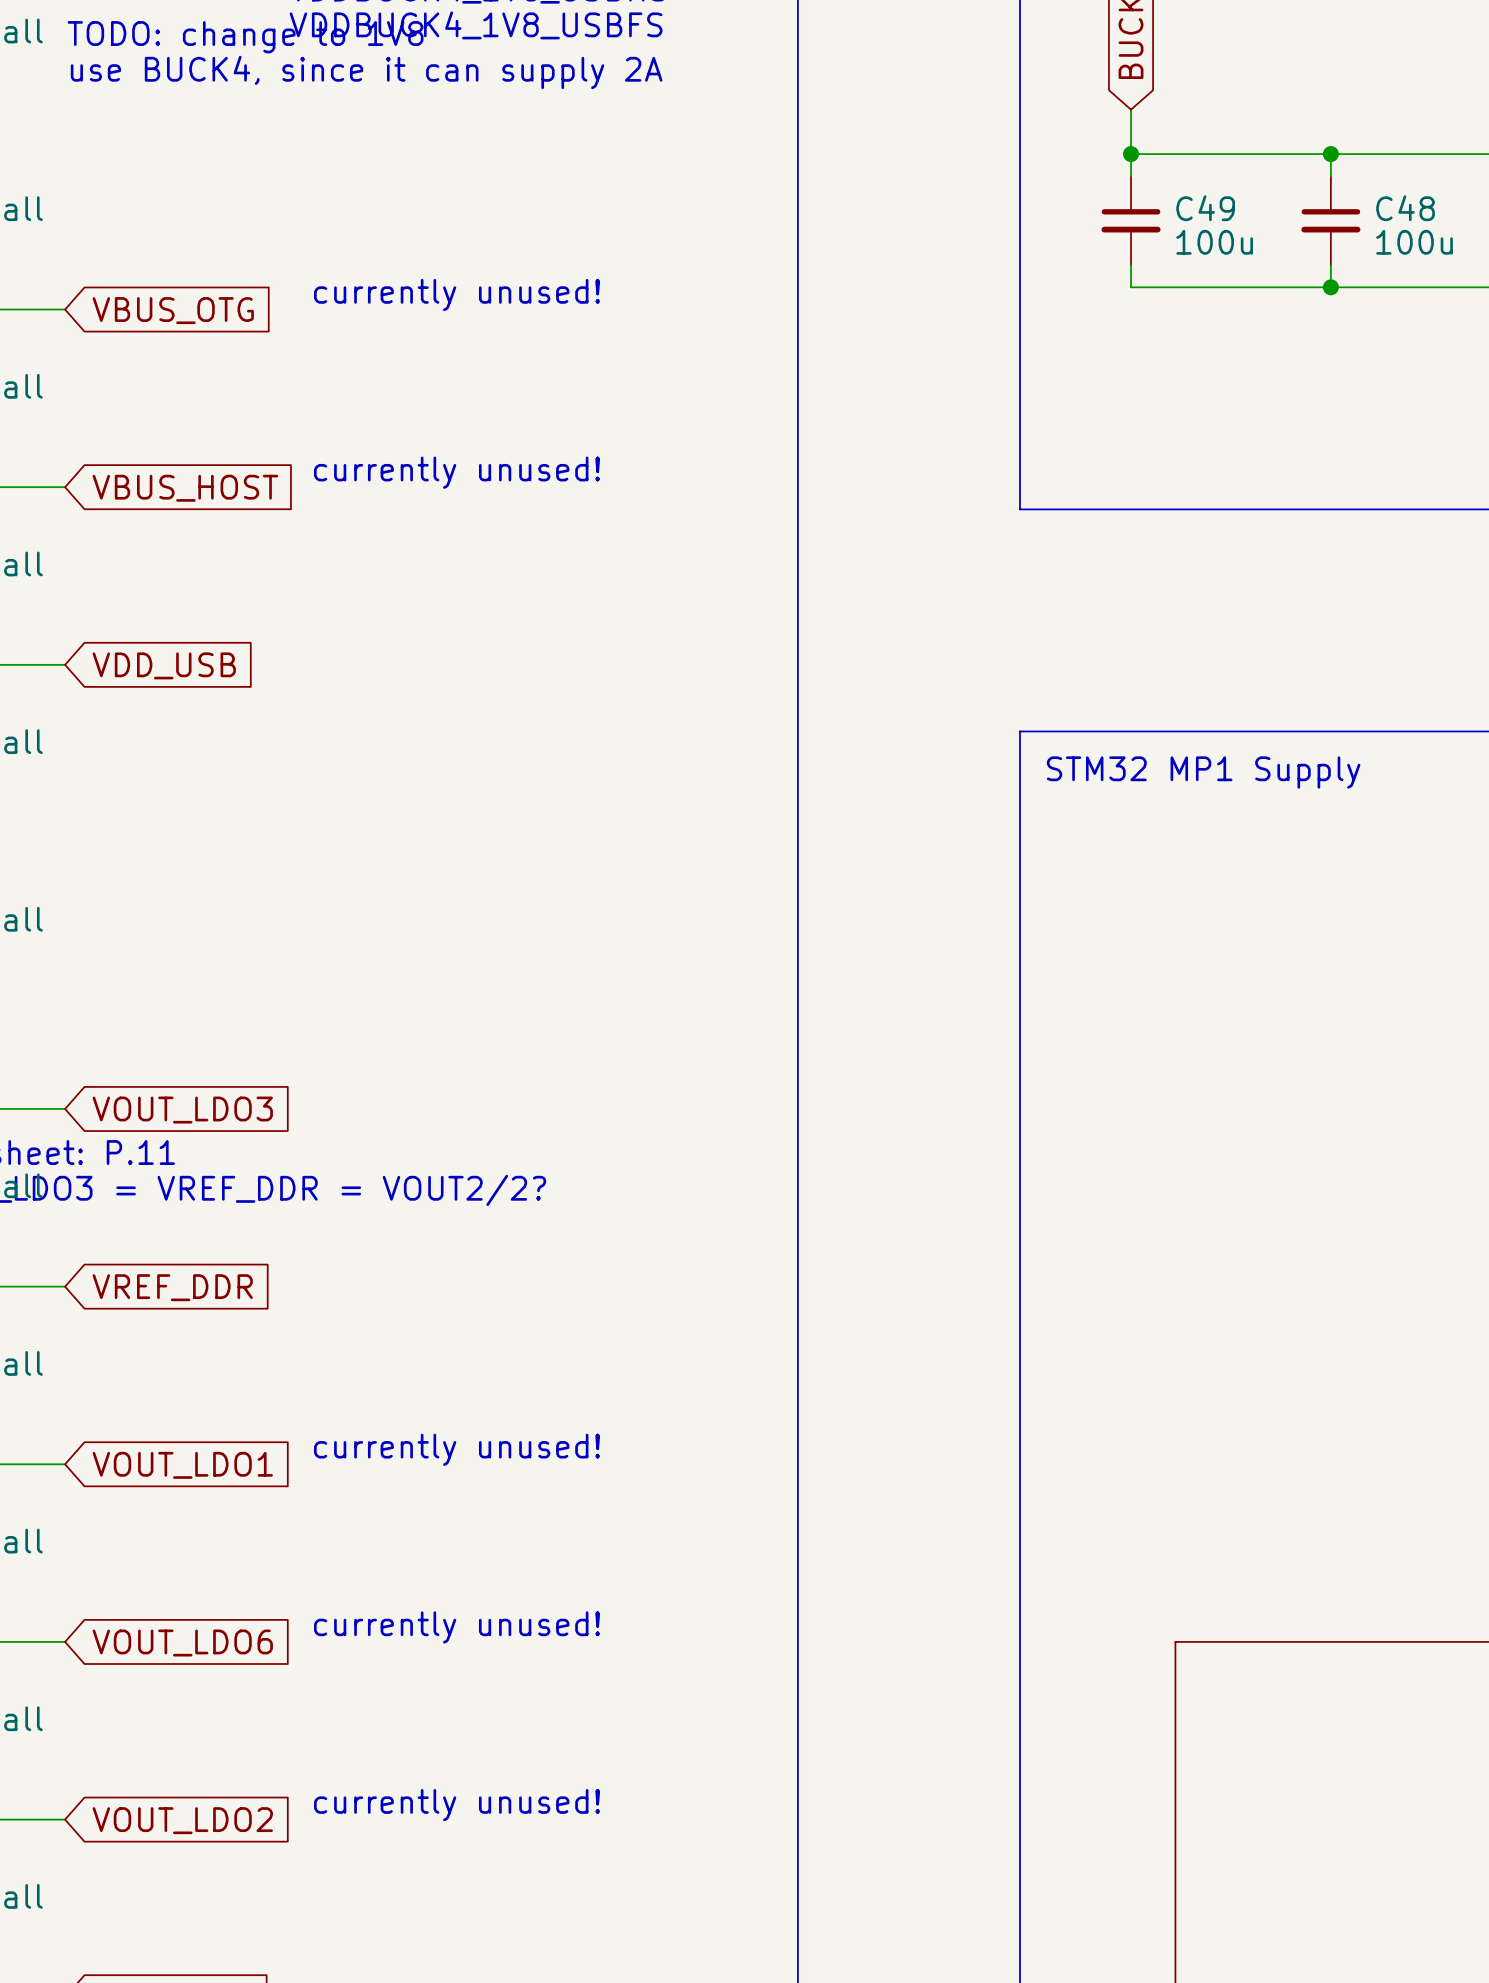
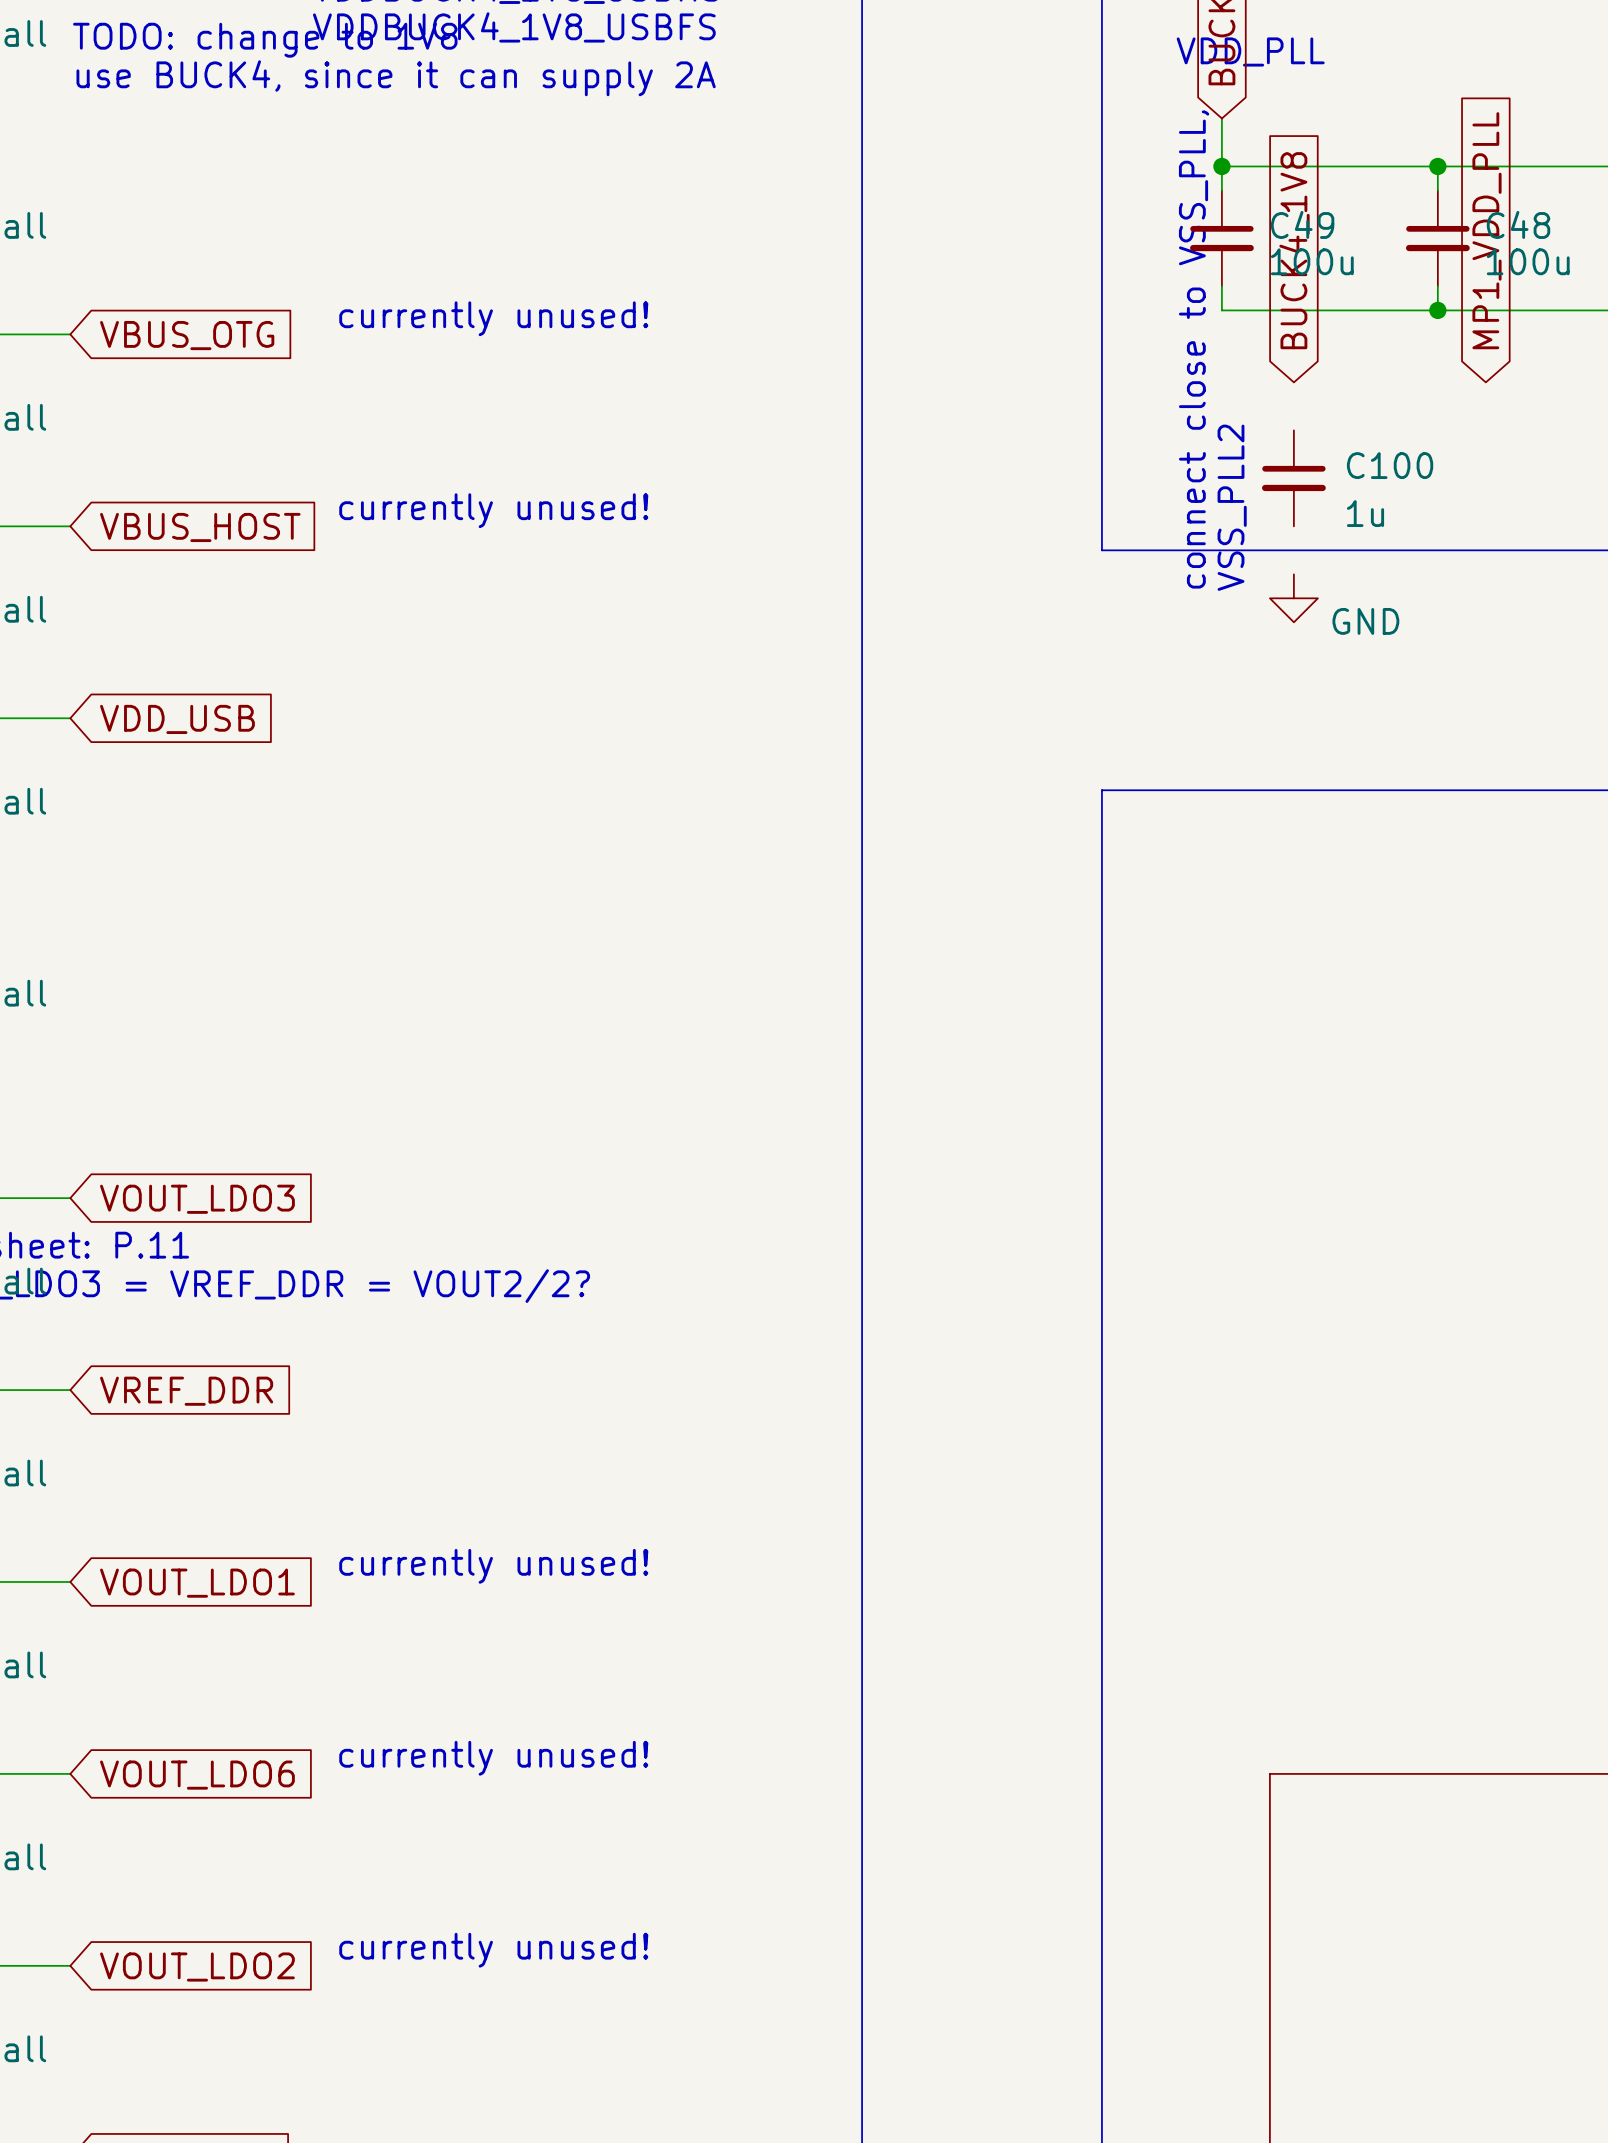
text: none -> VDD_PLL (1250, 51)
global label: none -> MP1_VDD_PLL (1486, 230)
global label: none -> BUCK4_1V8 (1294, 250)
text: none -> connect close to VSS_PLL, (1194, 349)
C100: none -> 1u (1293, 478)
text: none -> VSS_PLL2 (1232, 507)
power symbol: none -> GND (1293, 598)
text: STM32 MP1 Supply (1203, 772) -> none

